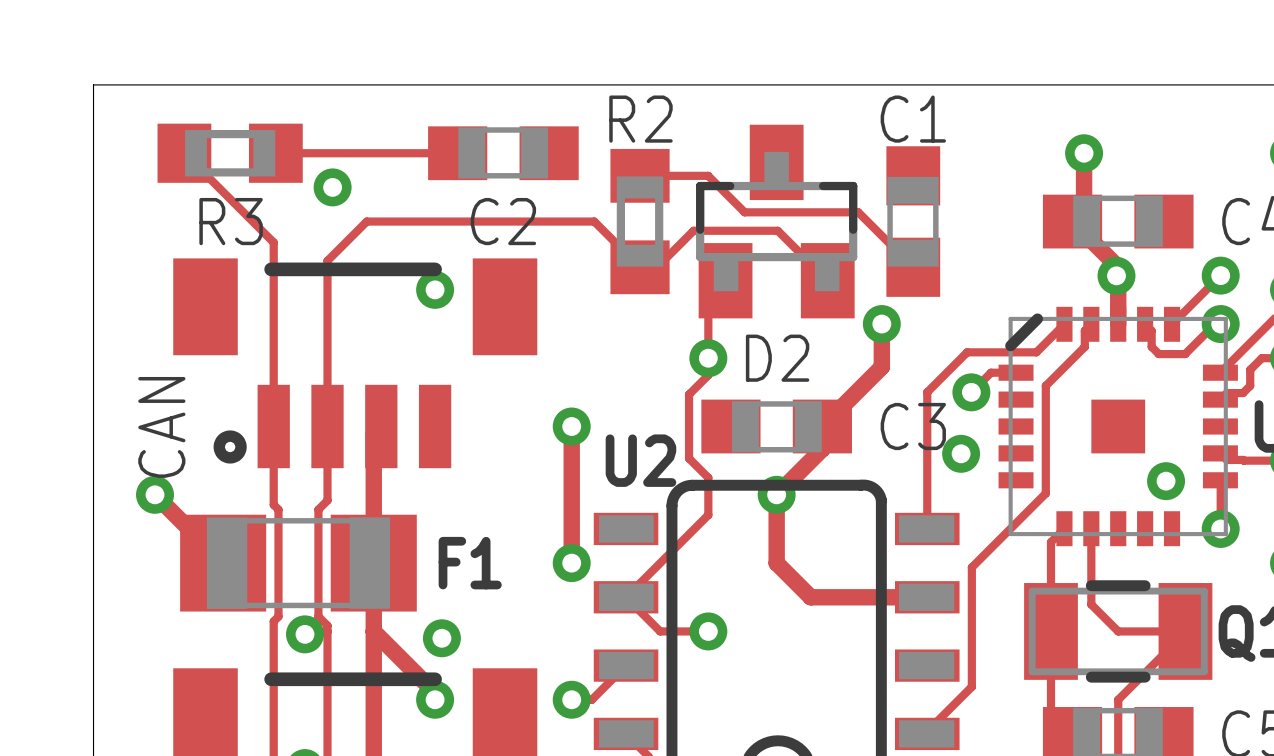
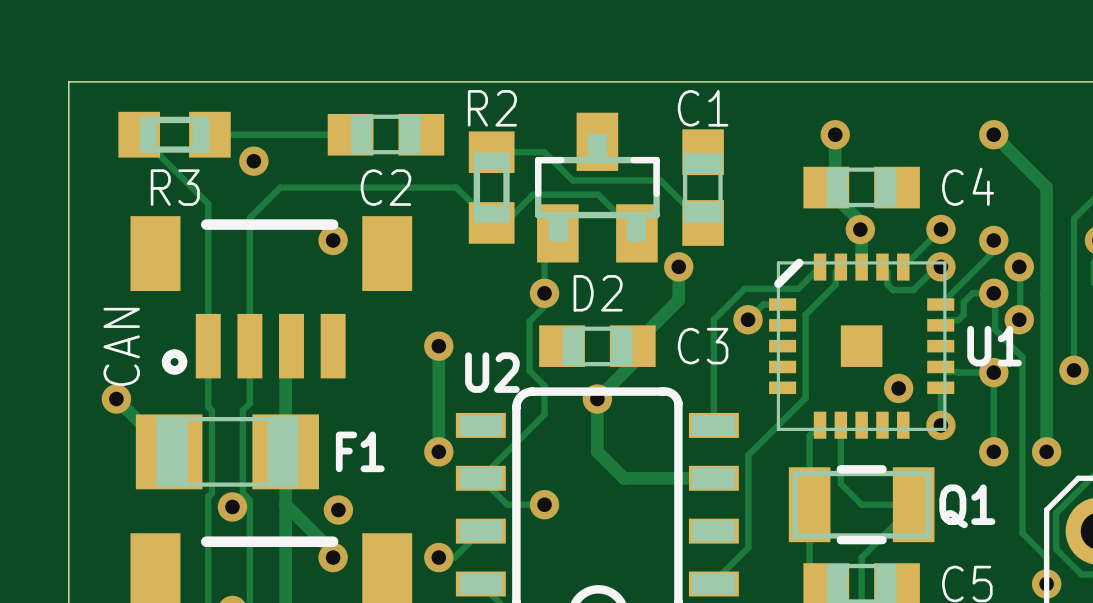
via: (961, 453) -> none

